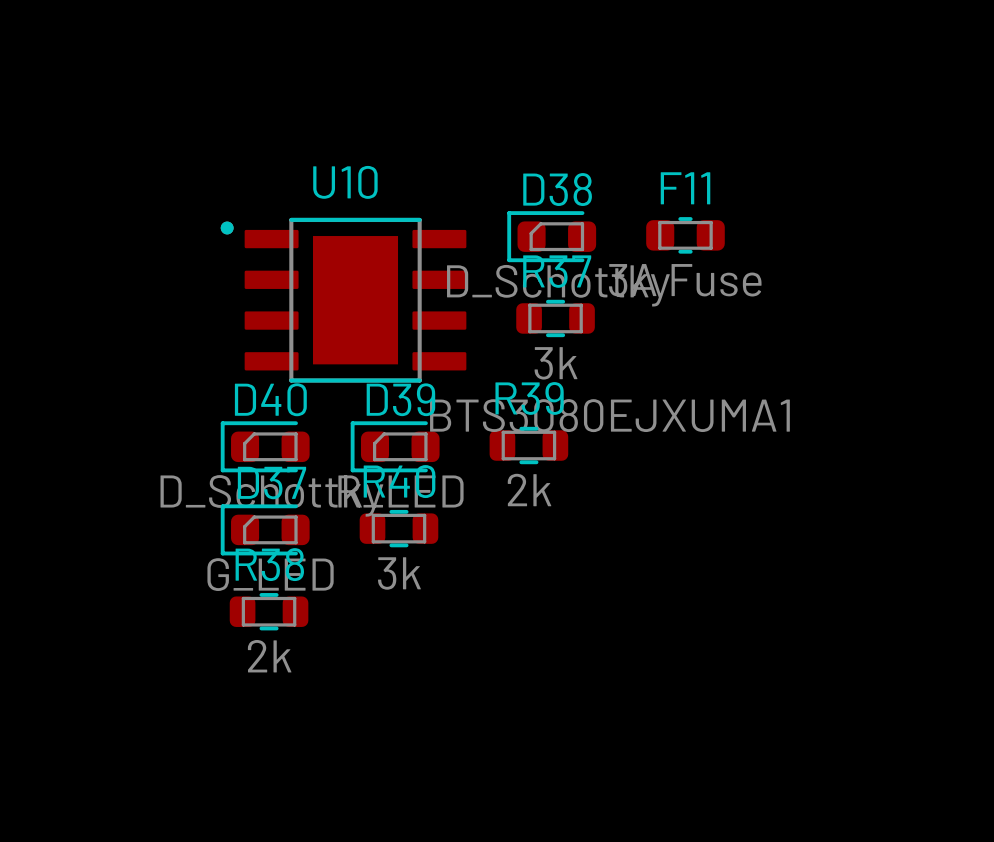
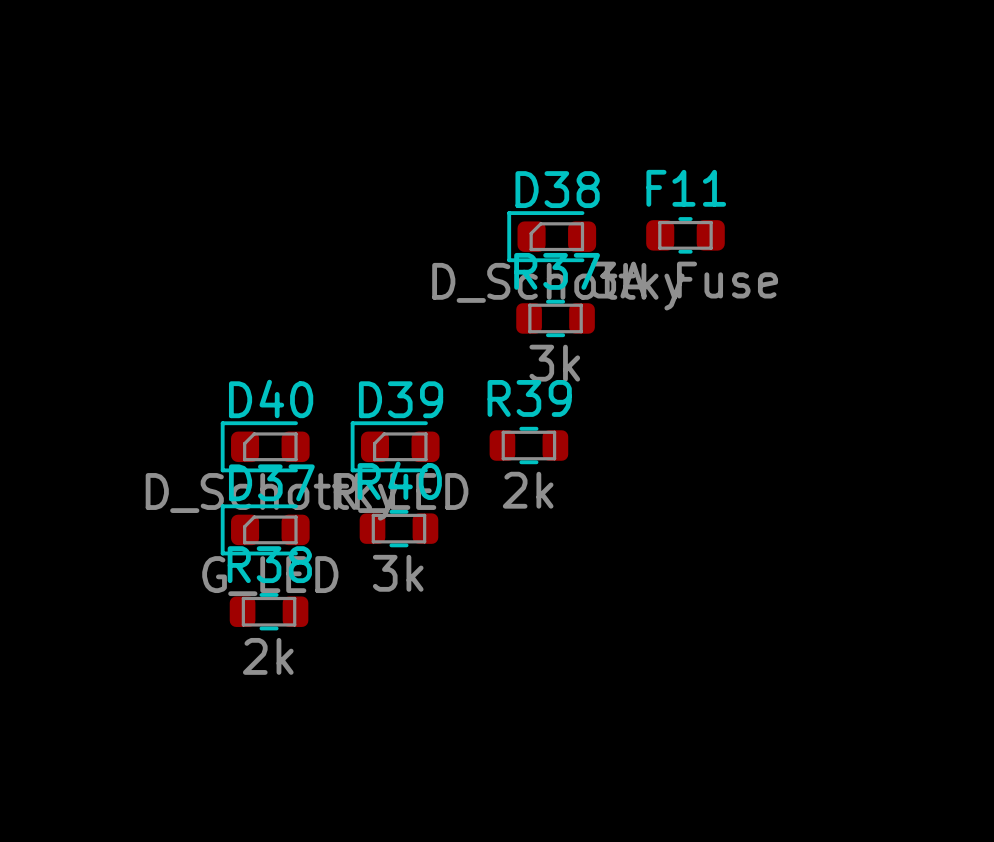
U10: BTS3080EJXUMA1 (343, 300) -> none

